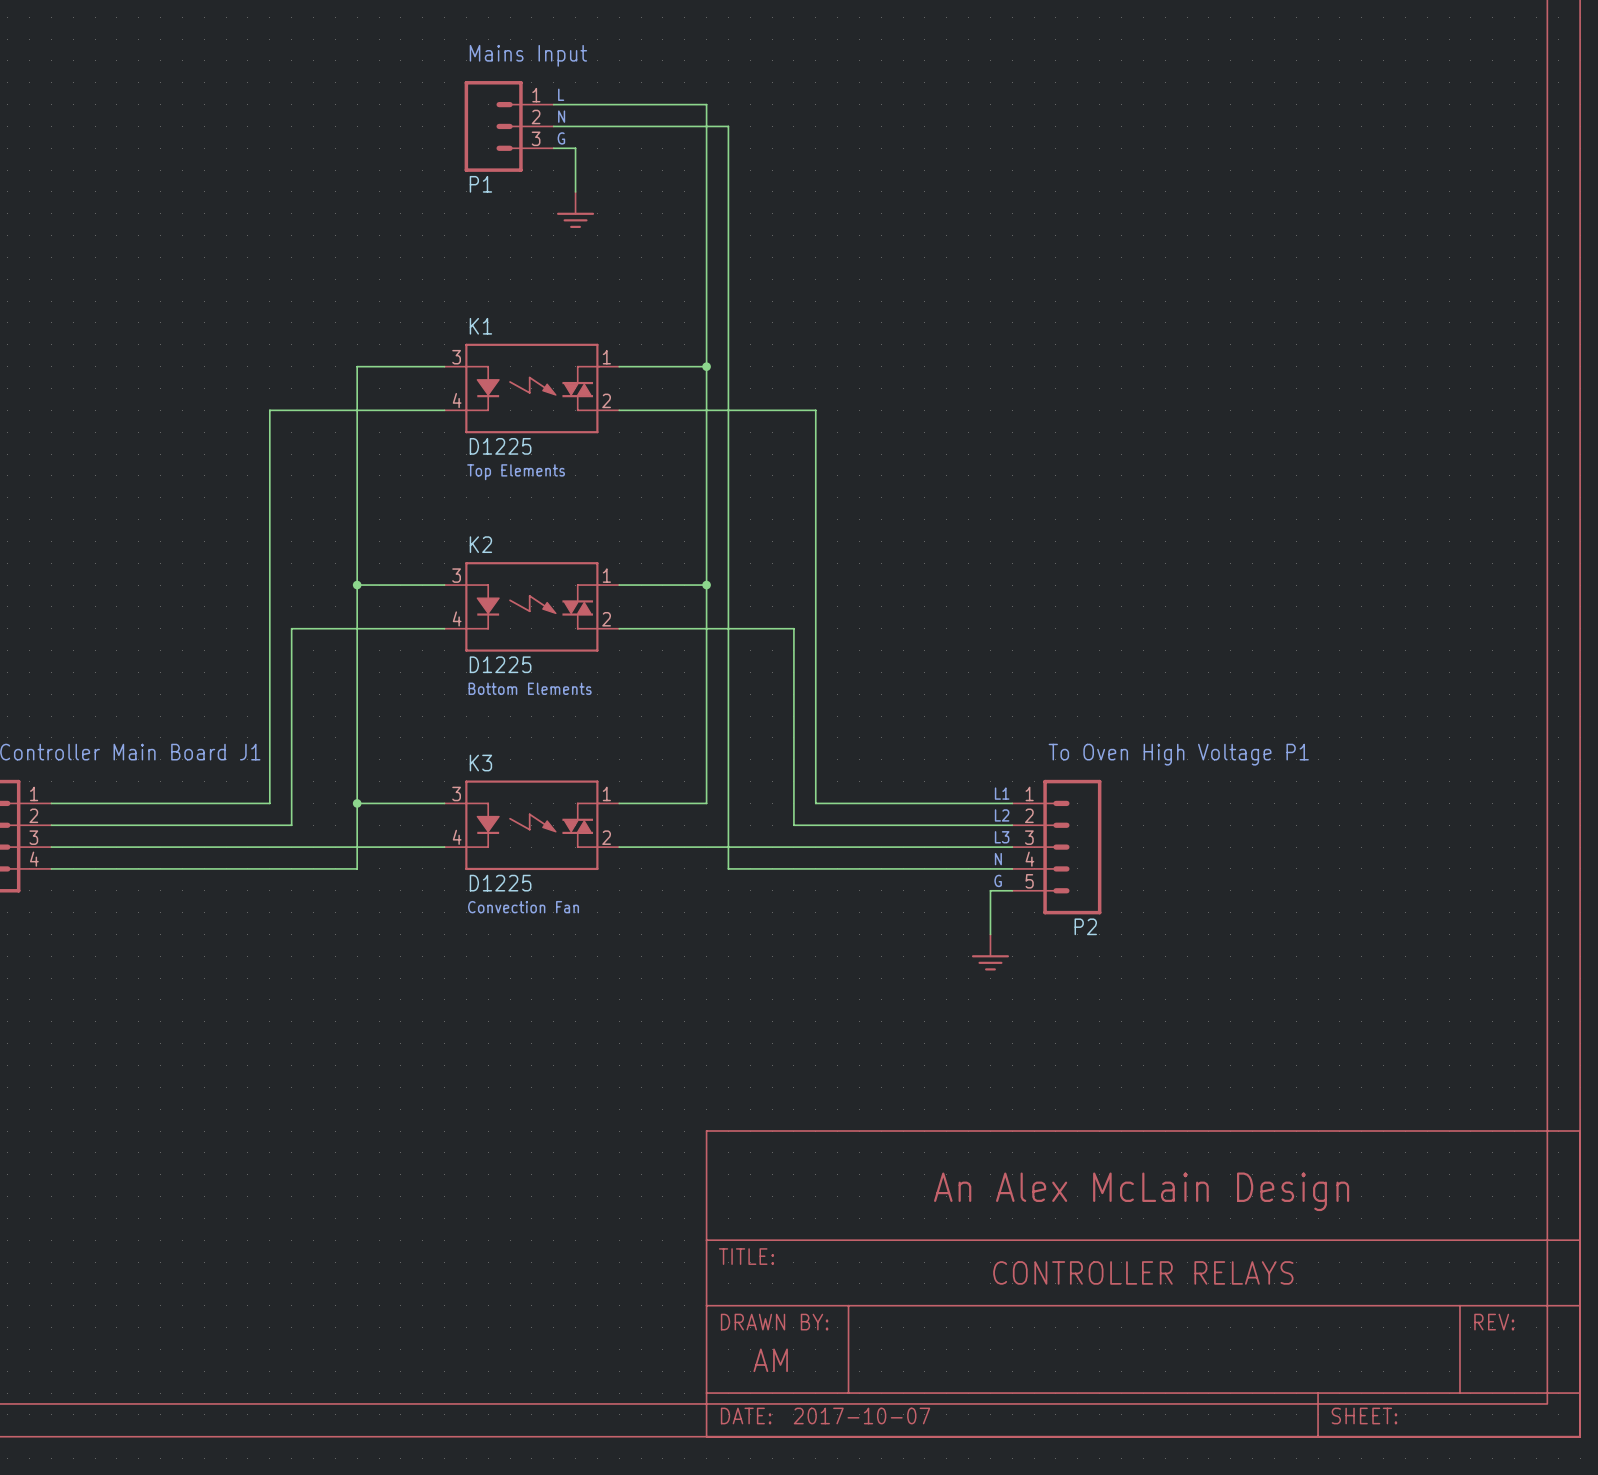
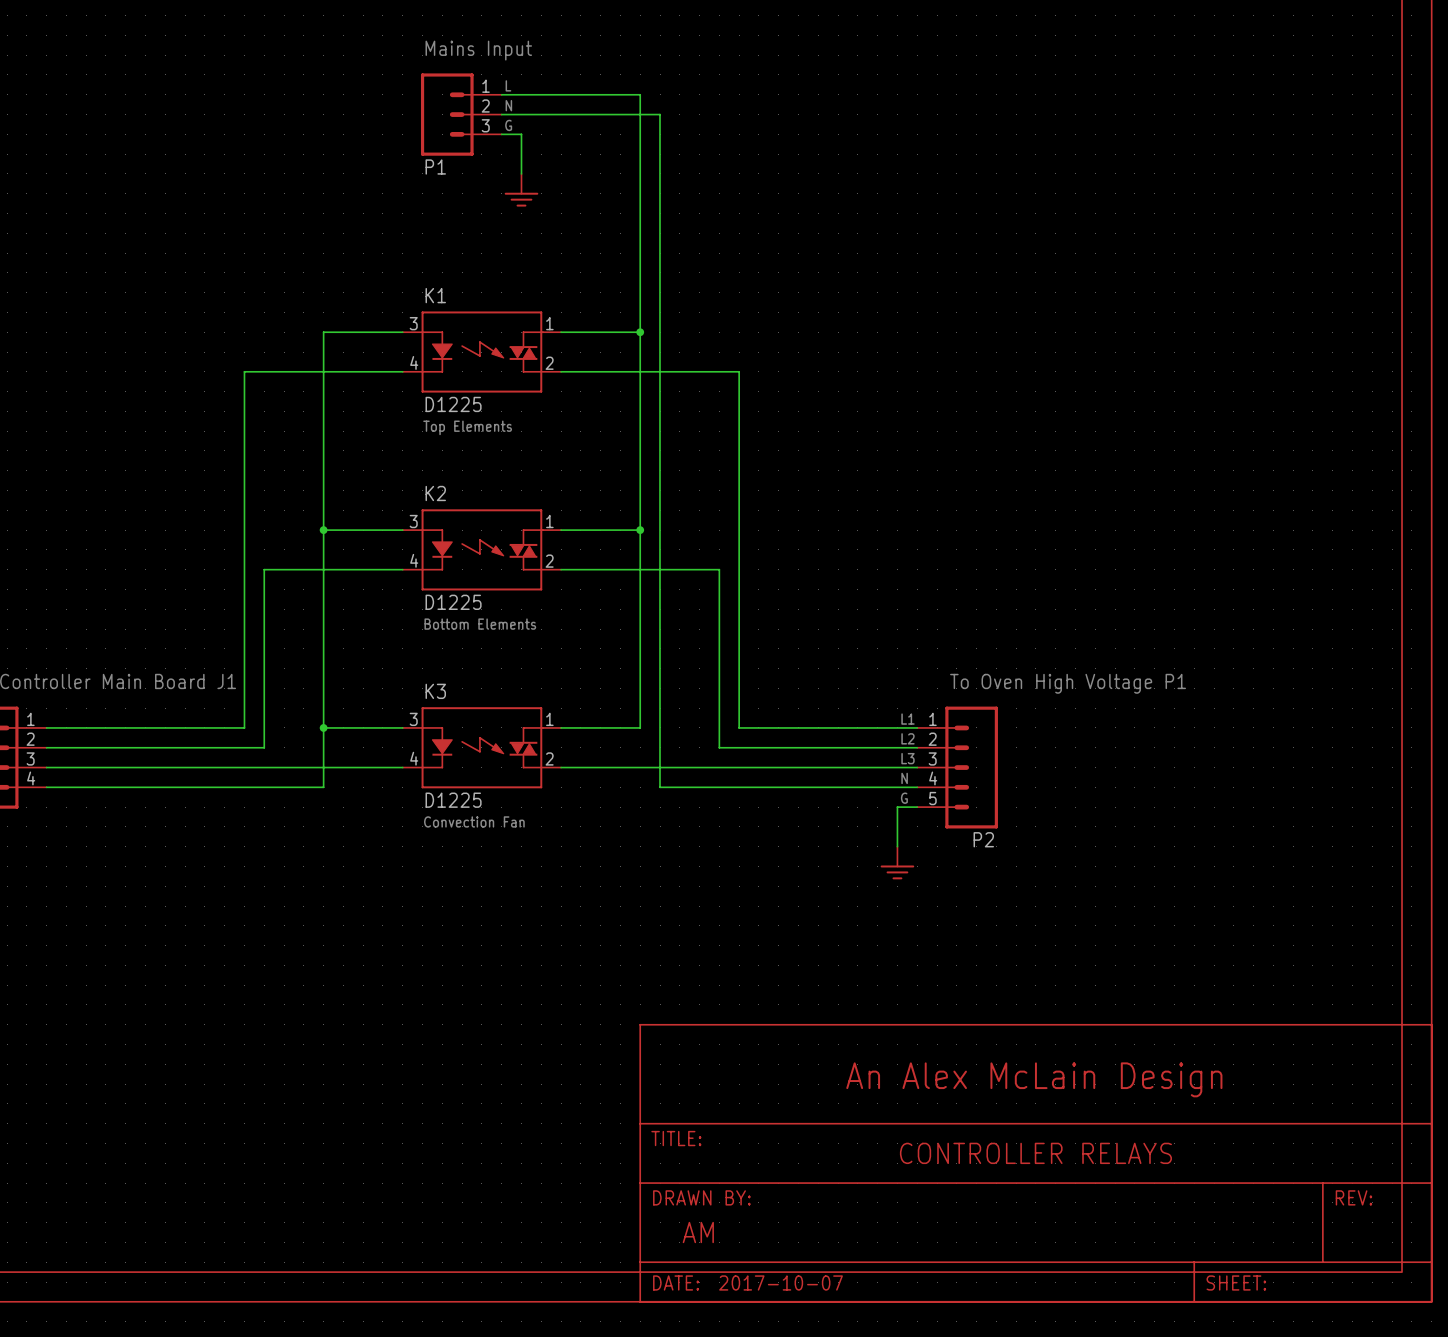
part symbol: [706, 1130, 1581, 1438] -> [639, 1024, 1433, 1303]

